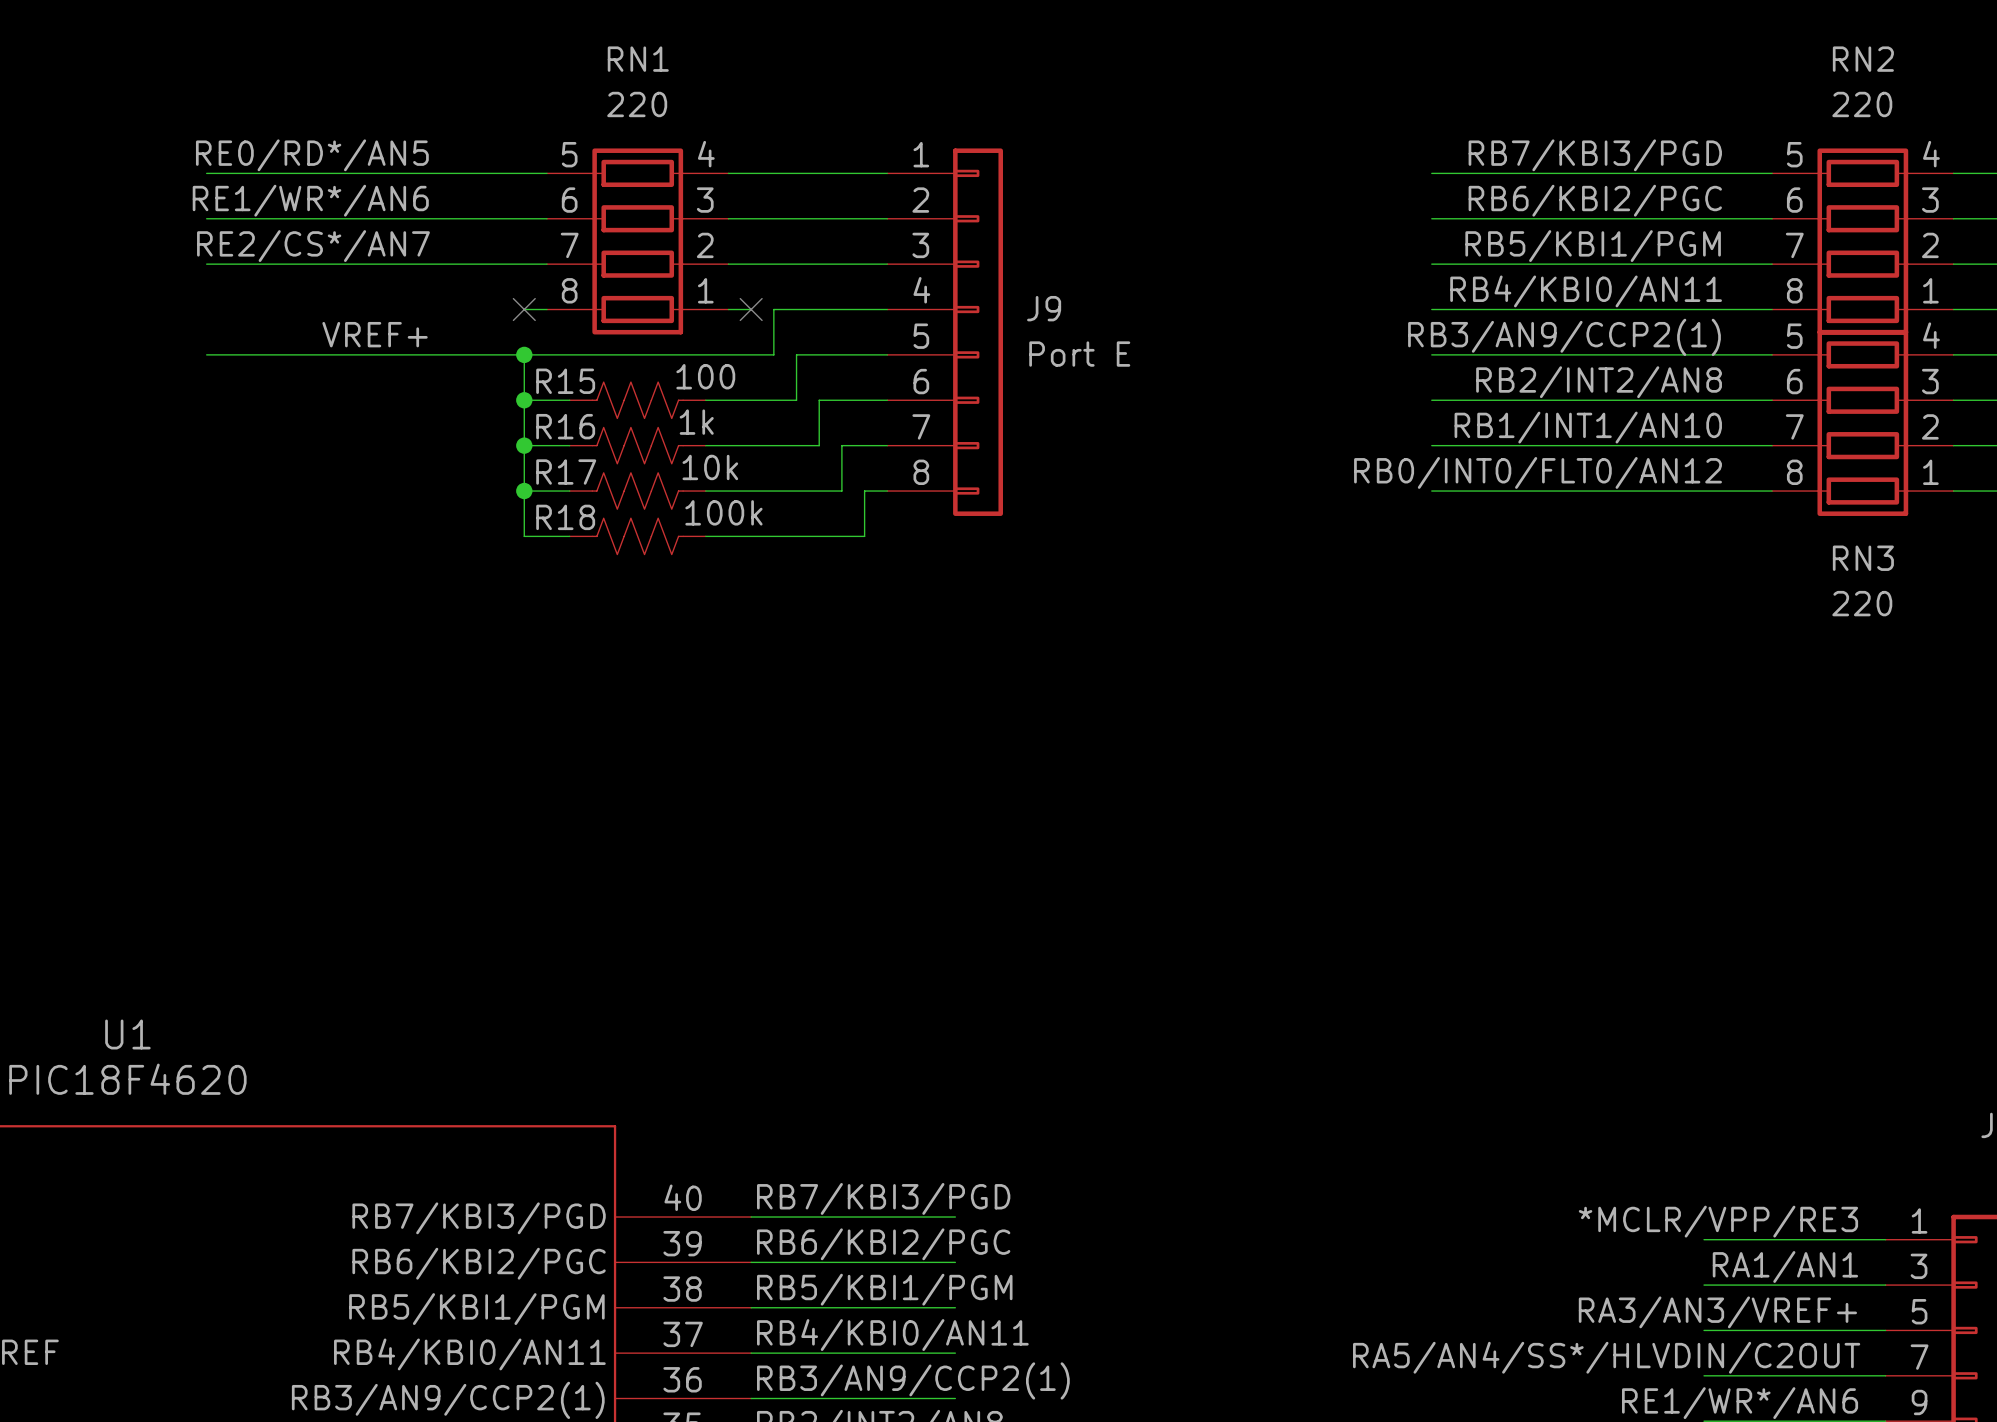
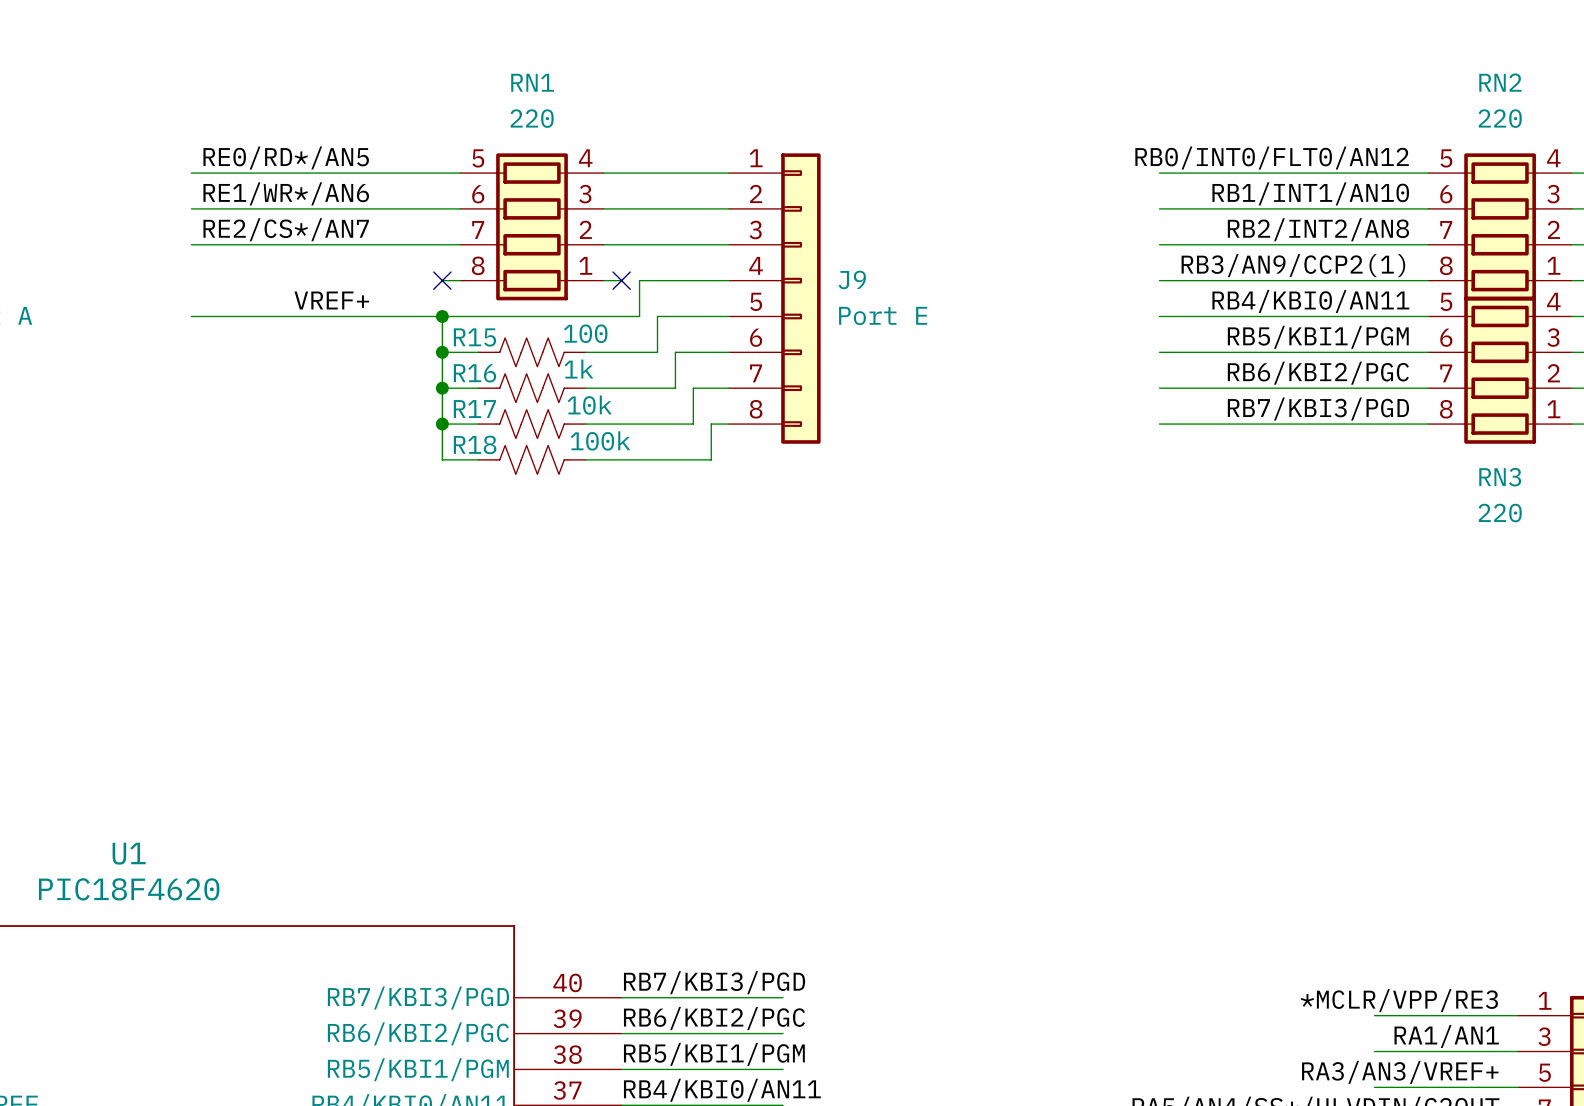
label position: RB7/KBI3/PGD (1595, 155) -> RB7/KBI3/PGD (1318, 409)
label position: RB6/KBI2/PGC (1595, 200) -> RB6/KBI2/PGC (1318, 373)
label position: RB5/KBI1/PGM (1593, 246) -> RB5/KBI1/PGM (1318, 337)
label position: RB4/KBI0/AN11 (1586, 291) -> RB4/KBI0/AN11 (1310, 301)
label position: RB3/AN9/CCP2(1) (1564, 337) -> RB3/AN9/CCP2(1) (1293, 265)
label position: RB2/INT2/AN8 (1599, 382) -> RB2/INT2/AN8 (1318, 229)
label position: RB1/INT1/AN10 (1588, 427) -> RB1/INT1/AN10 (1310, 193)
label position: RB0/INT0/FLT0/AN12 (1538, 472) -> RB0/INT0/FLT0/AN12 (1272, 158)

